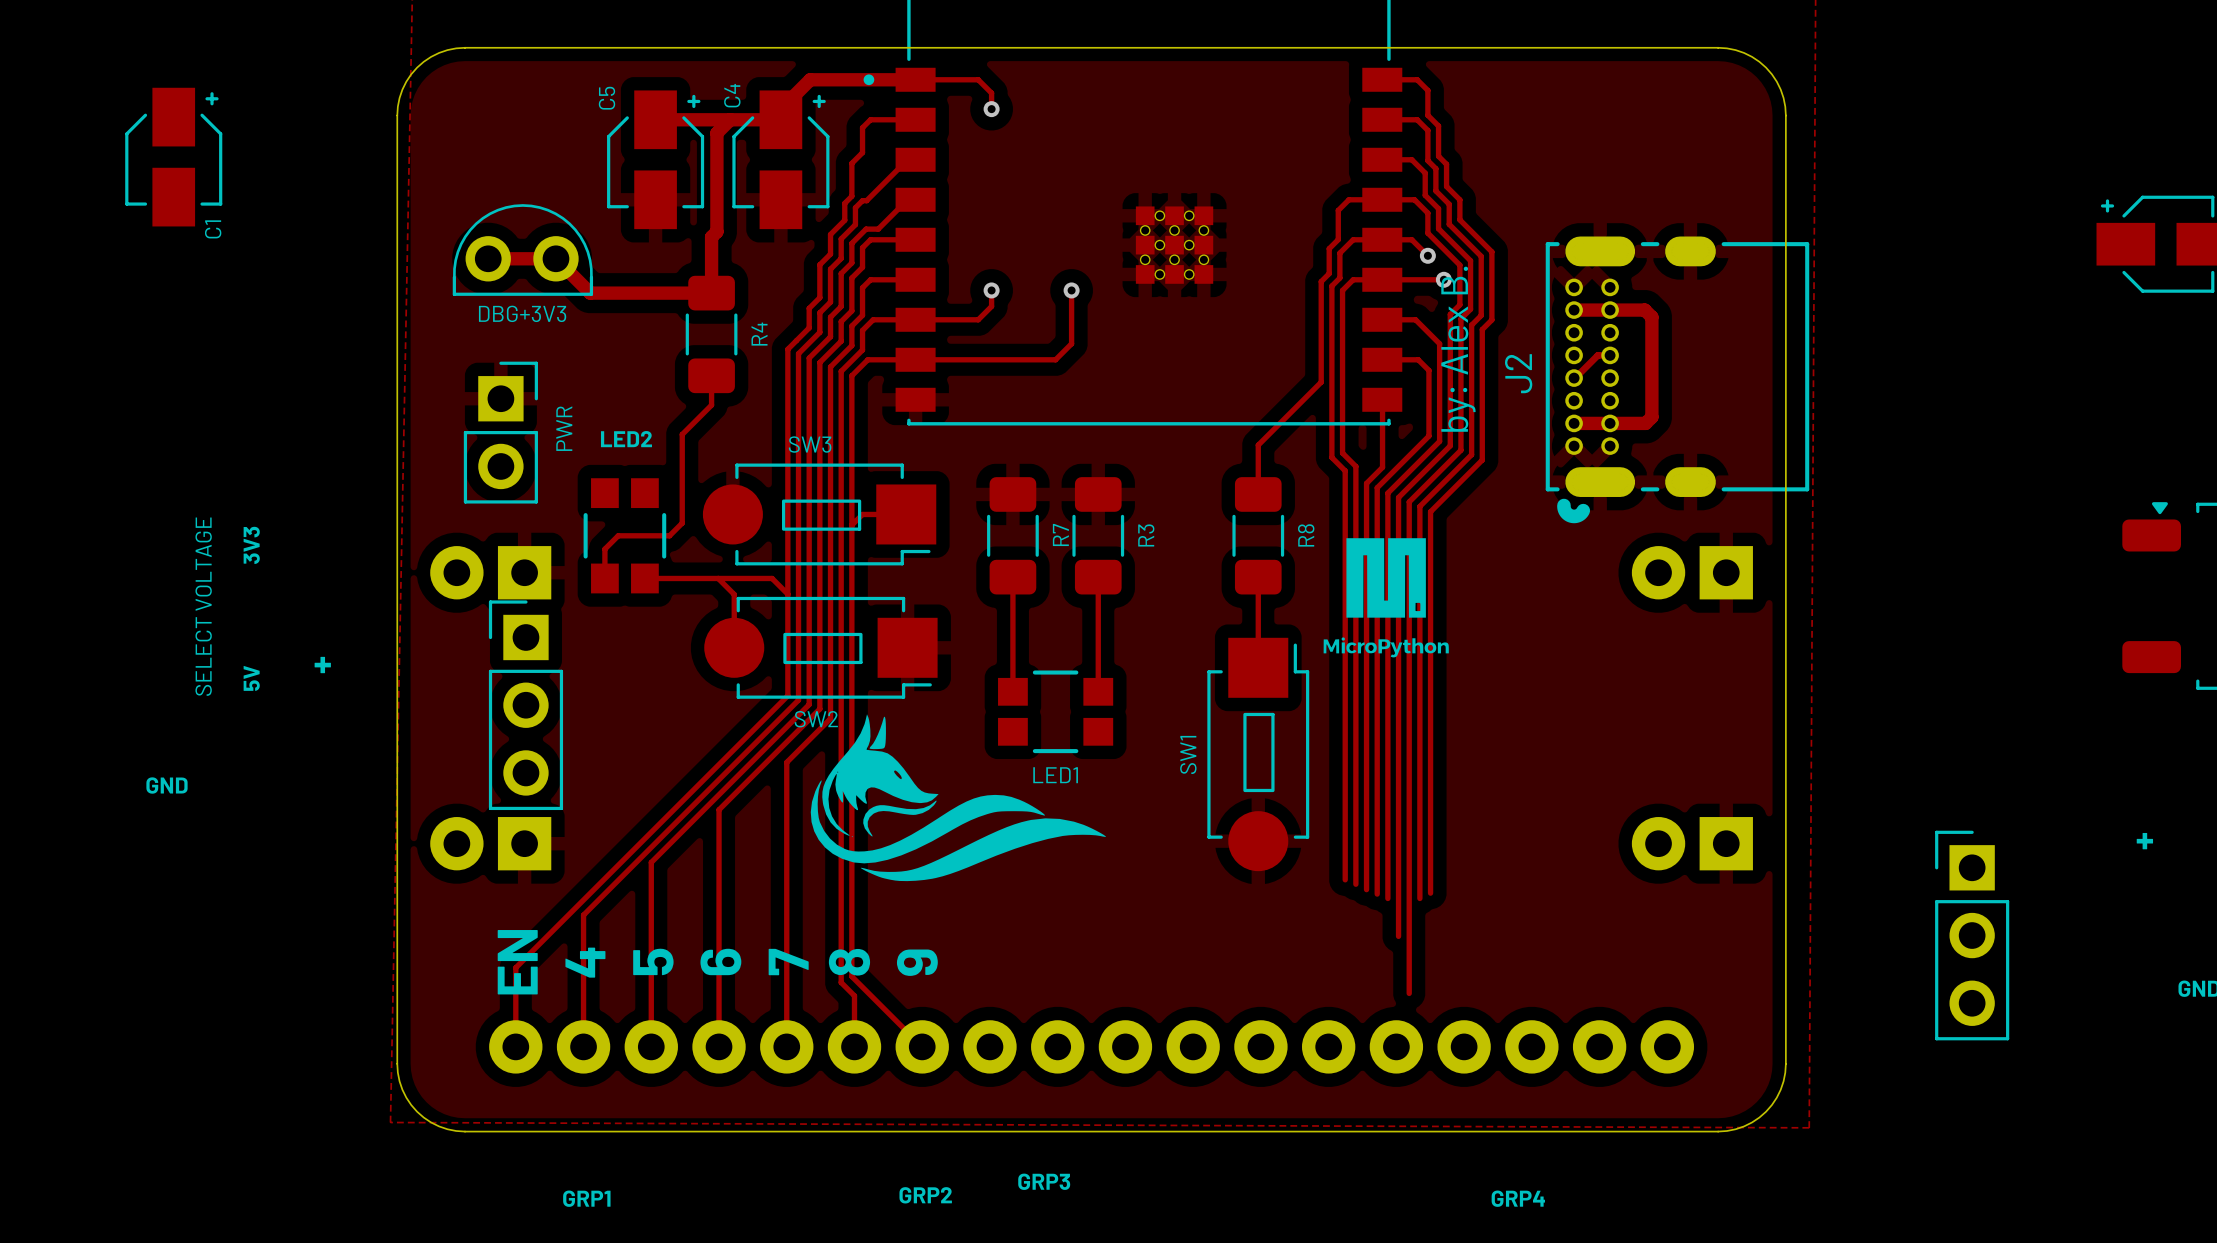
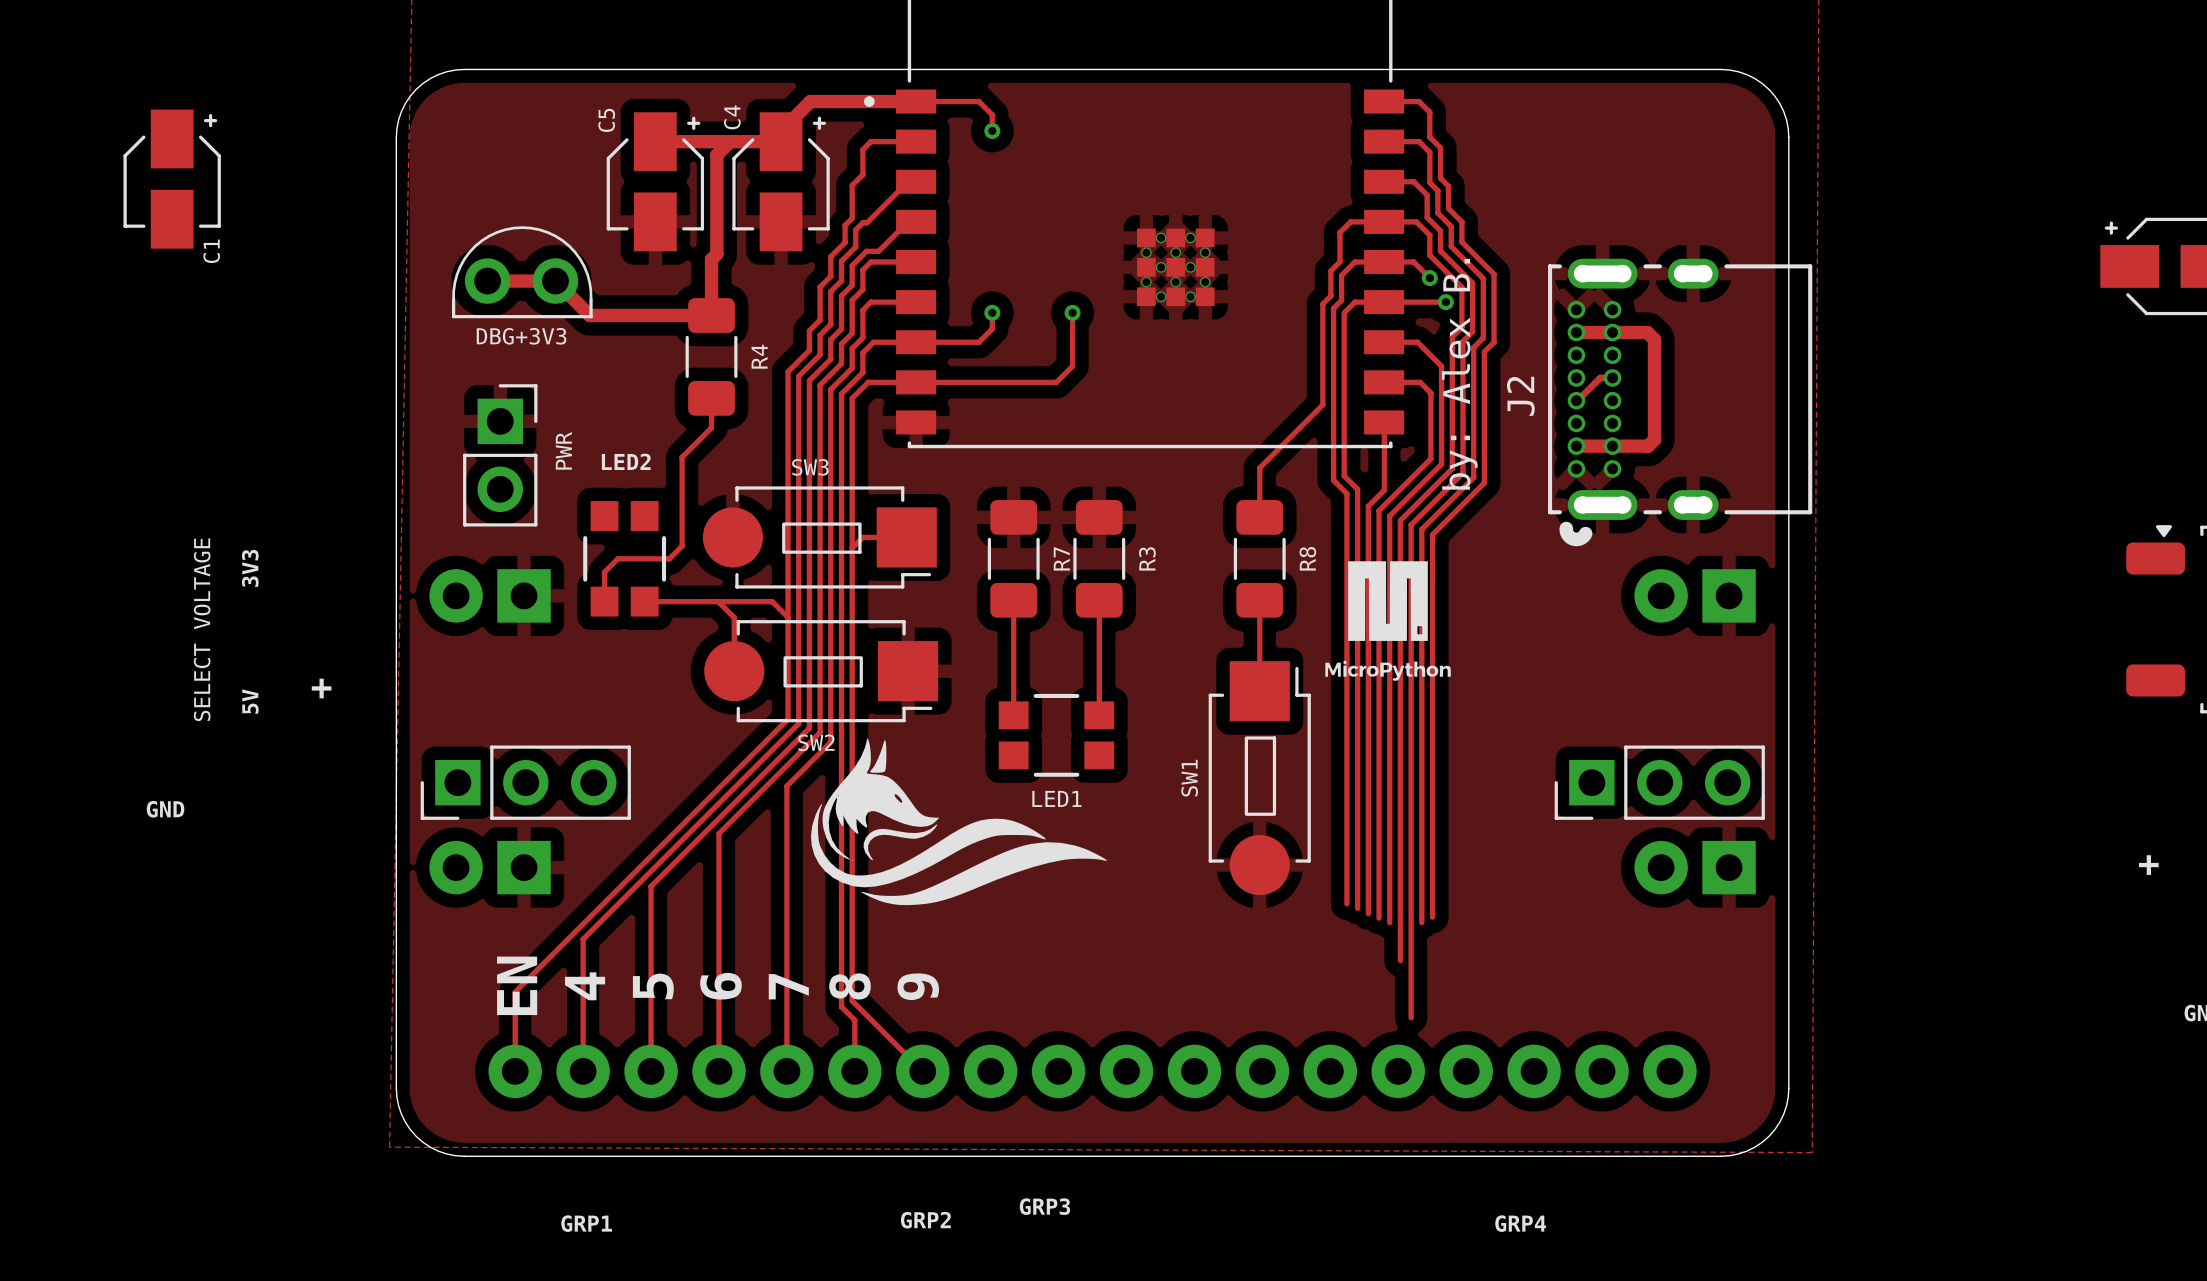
part rotation: 0° (525, 705) -> 90° counterclockwise (525, 782)
part rotation: 0° (1972, 935) -> 90° counterclockwise (1659, 782)
part position: (1972, 935) -> (1659, 782)

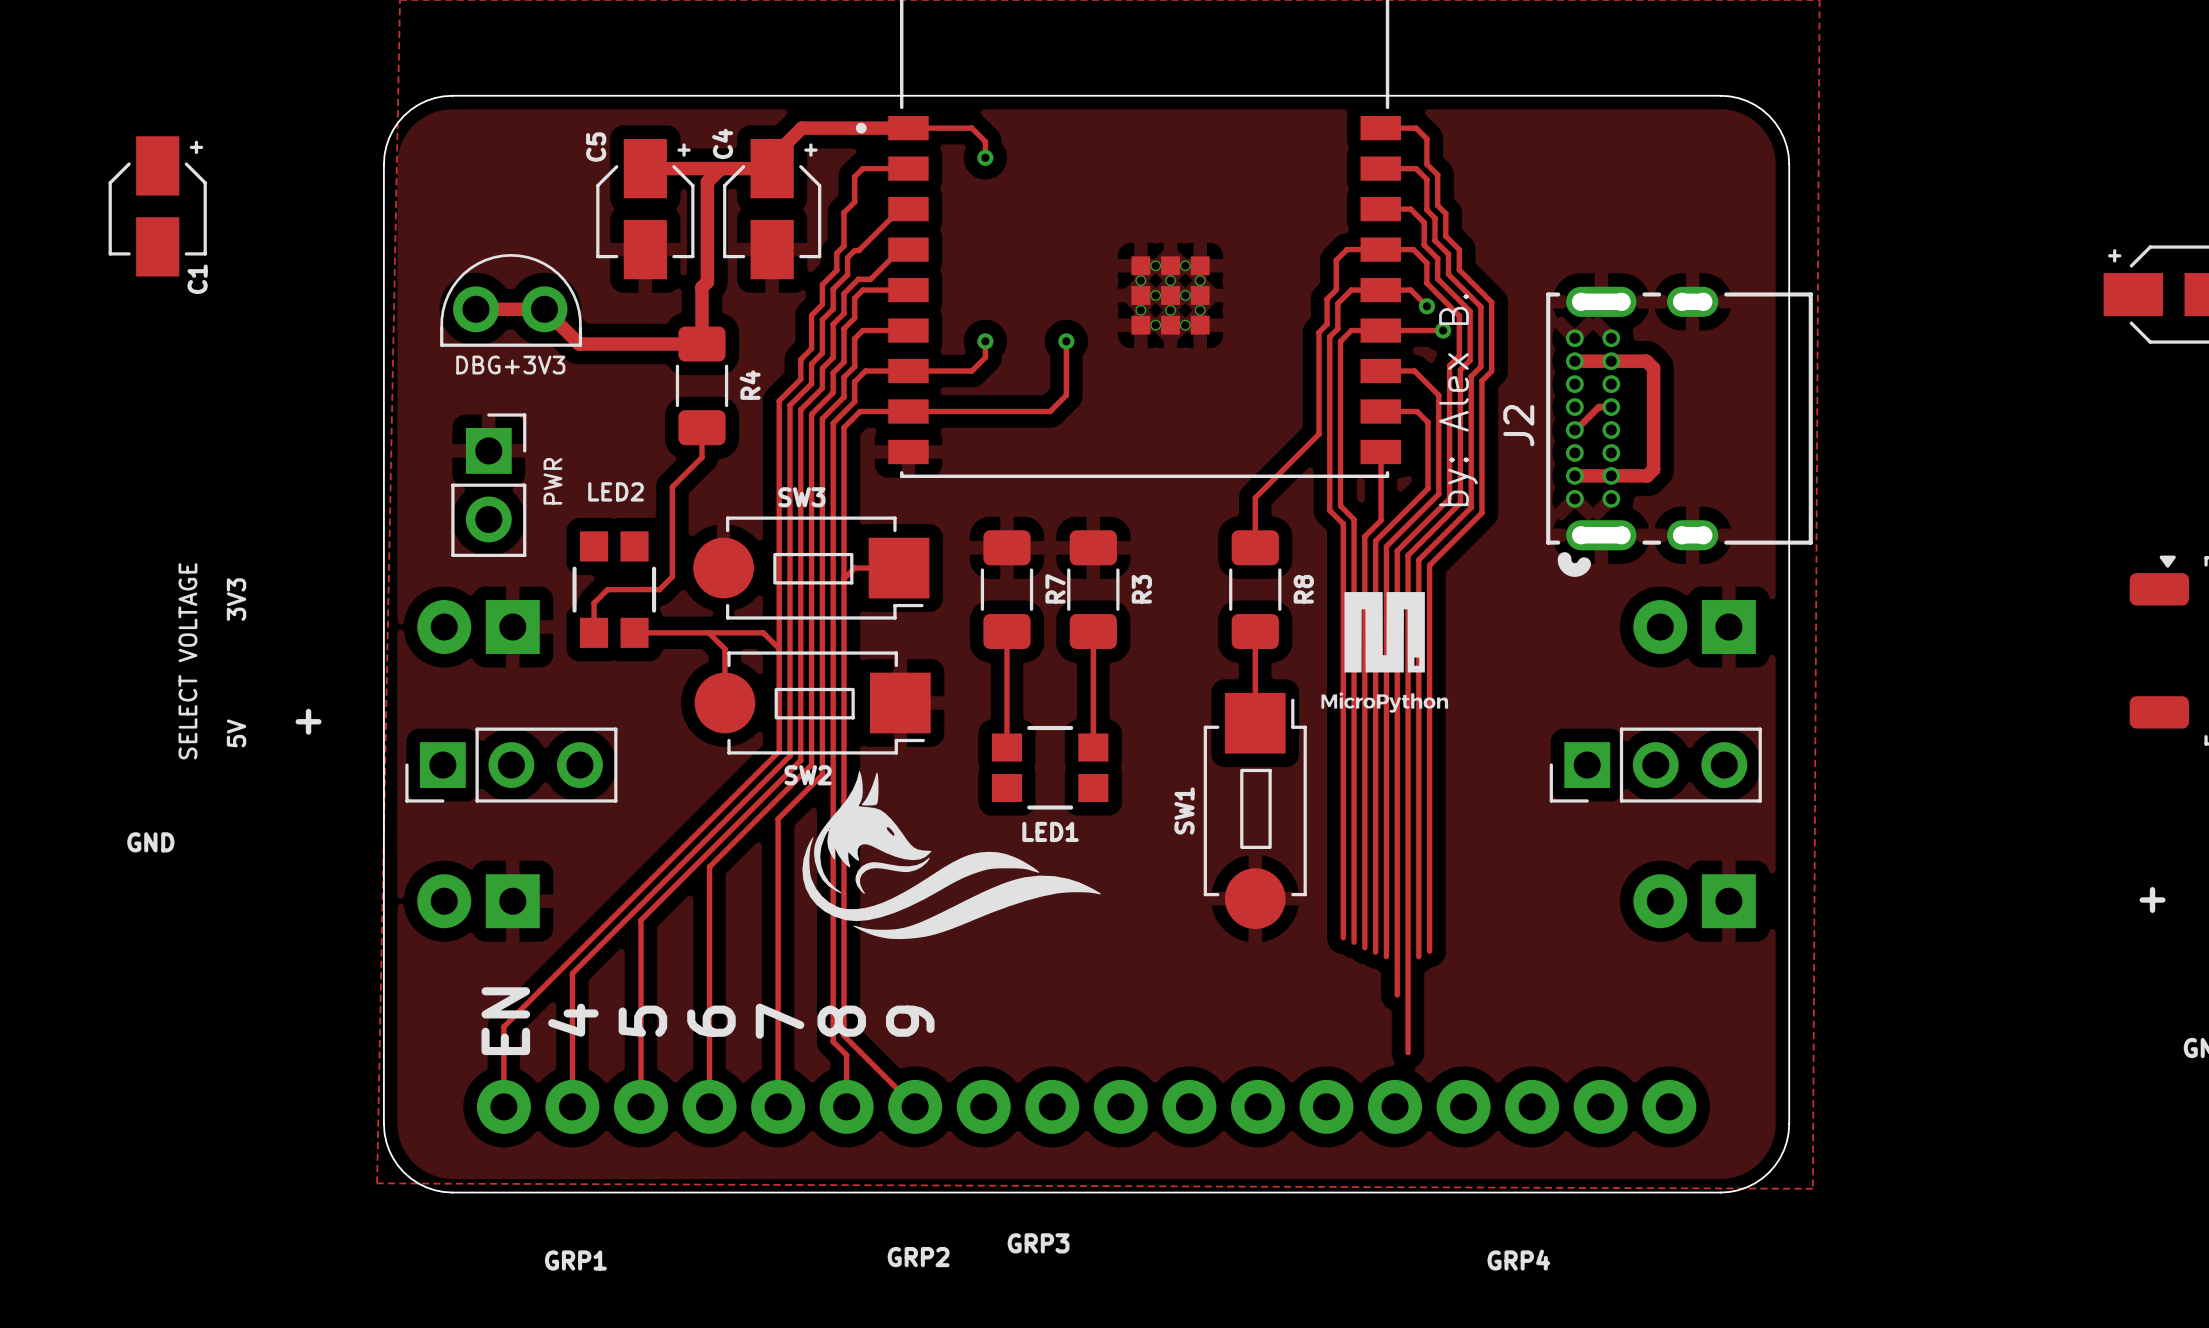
part position: (525, 782) -> (511, 765)
part position: (1659, 782) -> (1655, 765)

